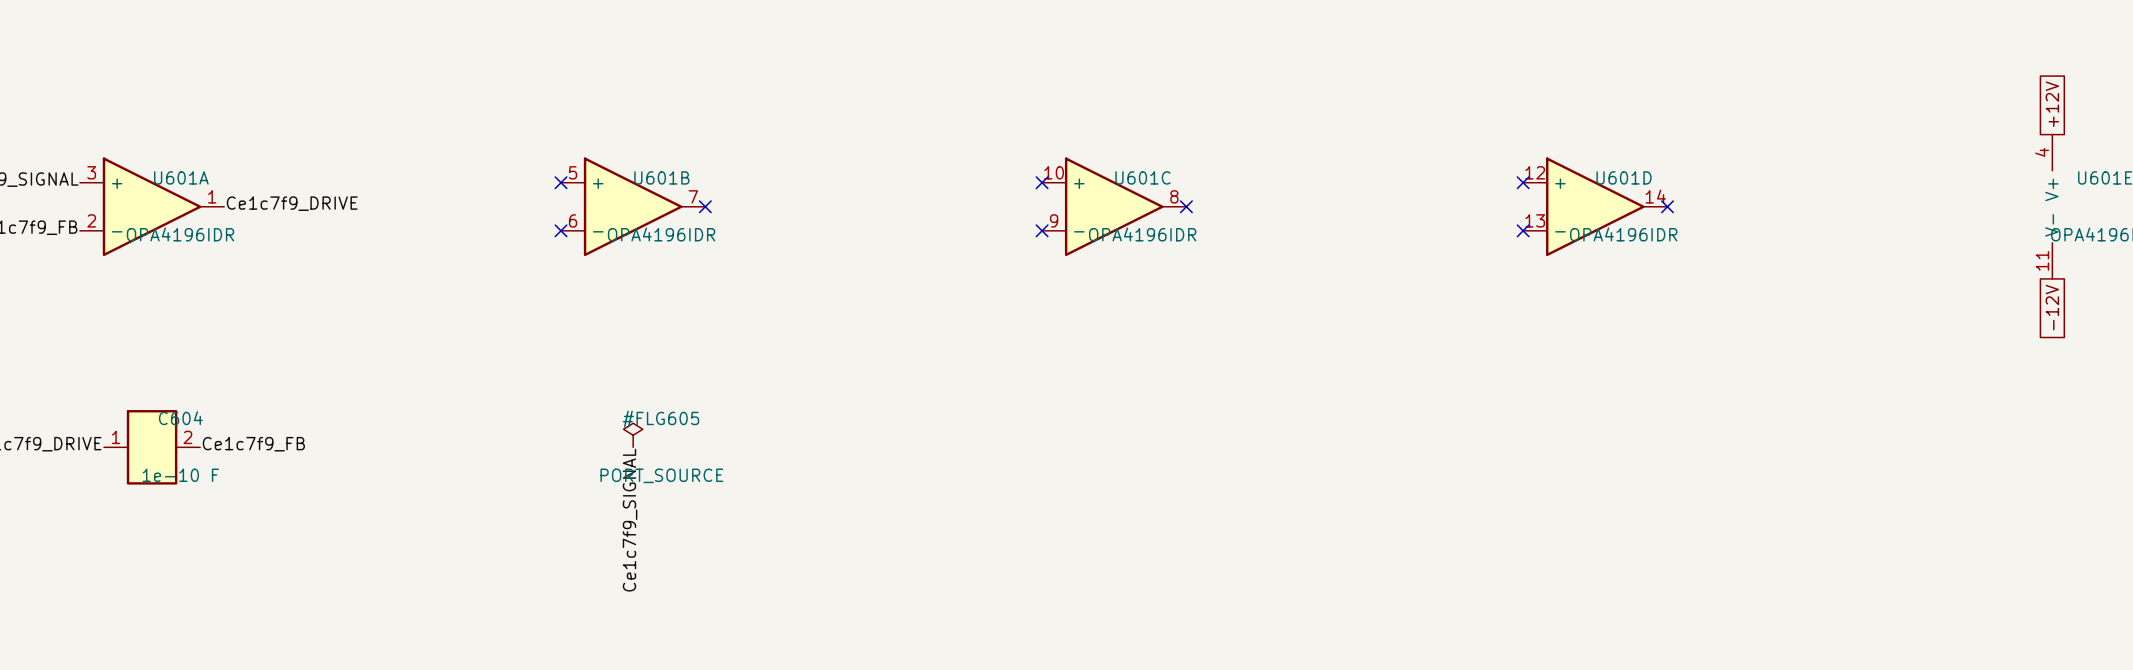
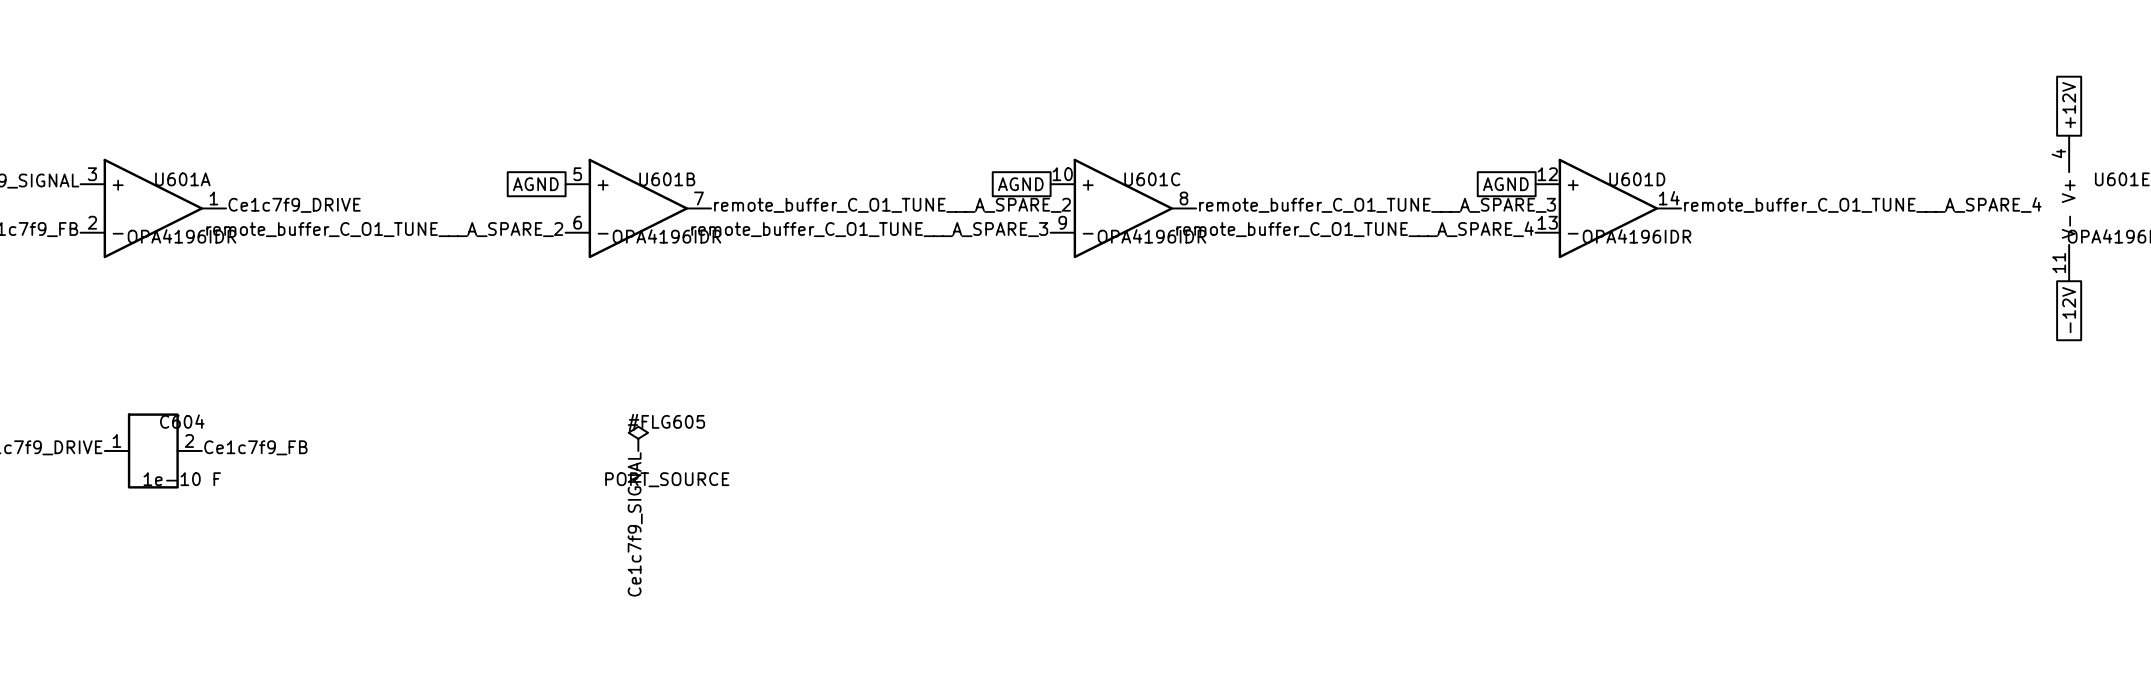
global label: none -> AGND (535, 184)
no-connect mark: (561, 182) -> none
global label: none -> AGND (1020, 184)
no-connect mark: (1042, 182) -> none
global label: none -> AGND (1505, 184)
no-connect mark: (1523, 182) -> none
label: none -> remote_buffer_C_O1_TUNE___A_SPARE_2 (892, 205)
label: none -> remote_buffer_C_O1_TUNE___A_SPARE_3 (1377, 205)
label: none -> remote_buffer_C_O1_TUNE___A_SPARE_4 (1862, 205)
no-connect mark: (705, 206) -> none
no-connect mark: (1186, 206) -> none
no-connect mark: (1667, 206) -> none
label: none -> remote_buffer_C_O1_TUNE___A_SPARE_2 (384, 229)
label: none -> remote_buffer_C_O1_TUNE___A_SPARE_3 (869, 229)
label: none -> remote_buffer_C_O1_TUNE___A_SPARE_4 (1355, 229)
no-connect mark: (561, 230) -> none
no-connect mark: (1042, 230) -> none
no-connect mark: (1523, 230) -> none

